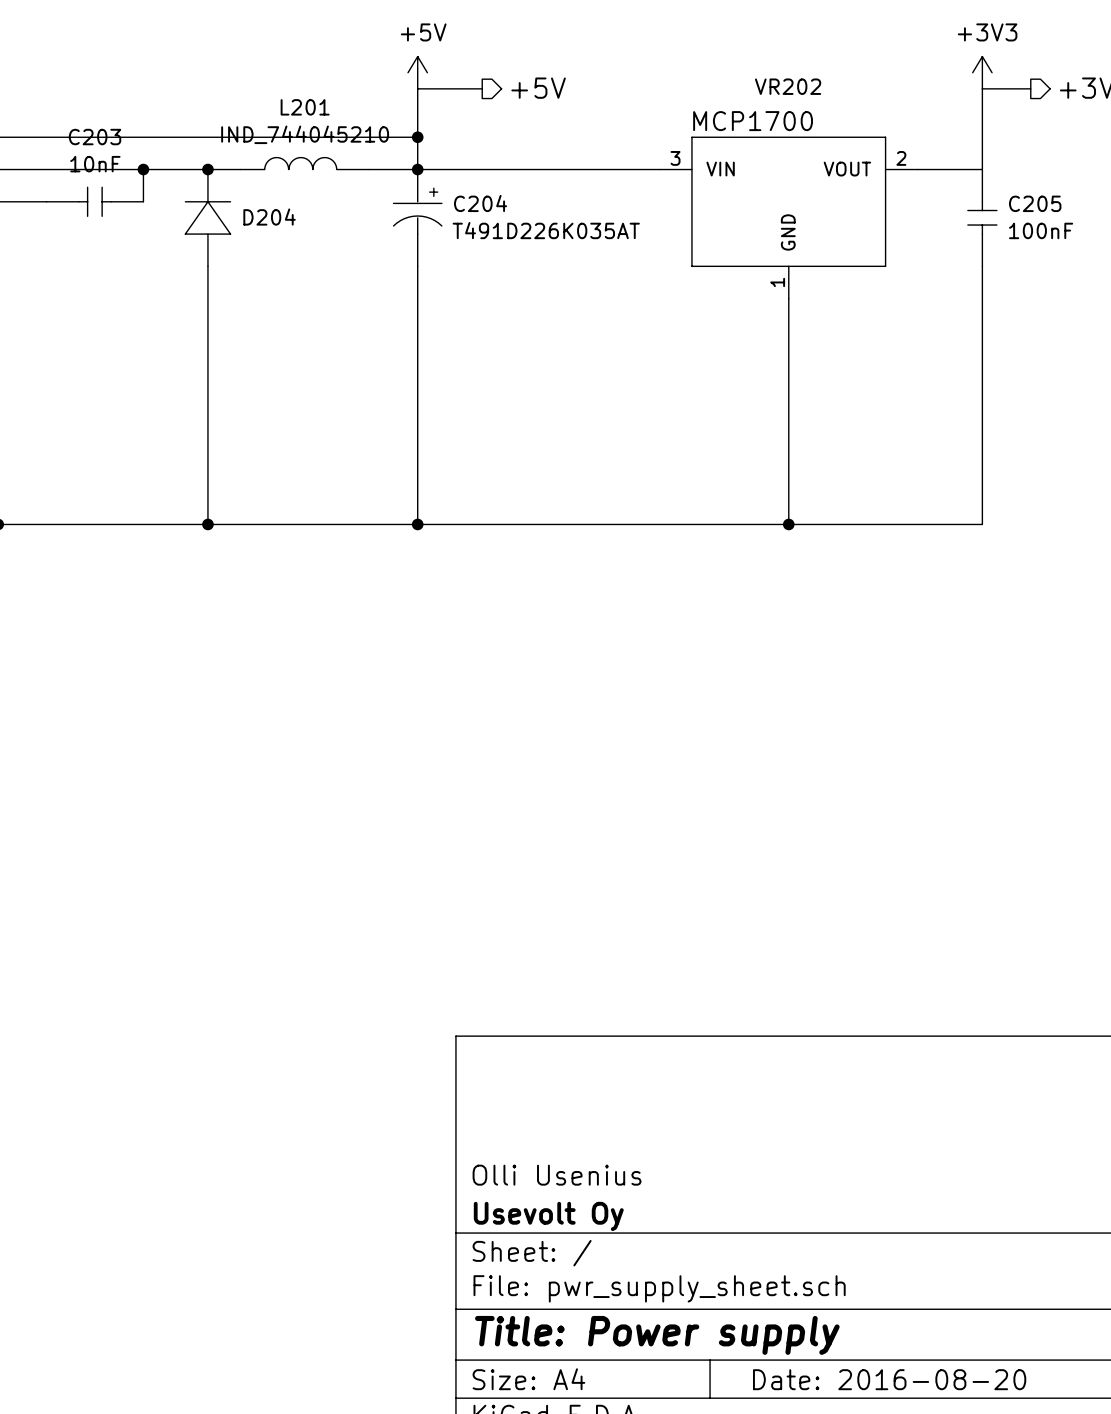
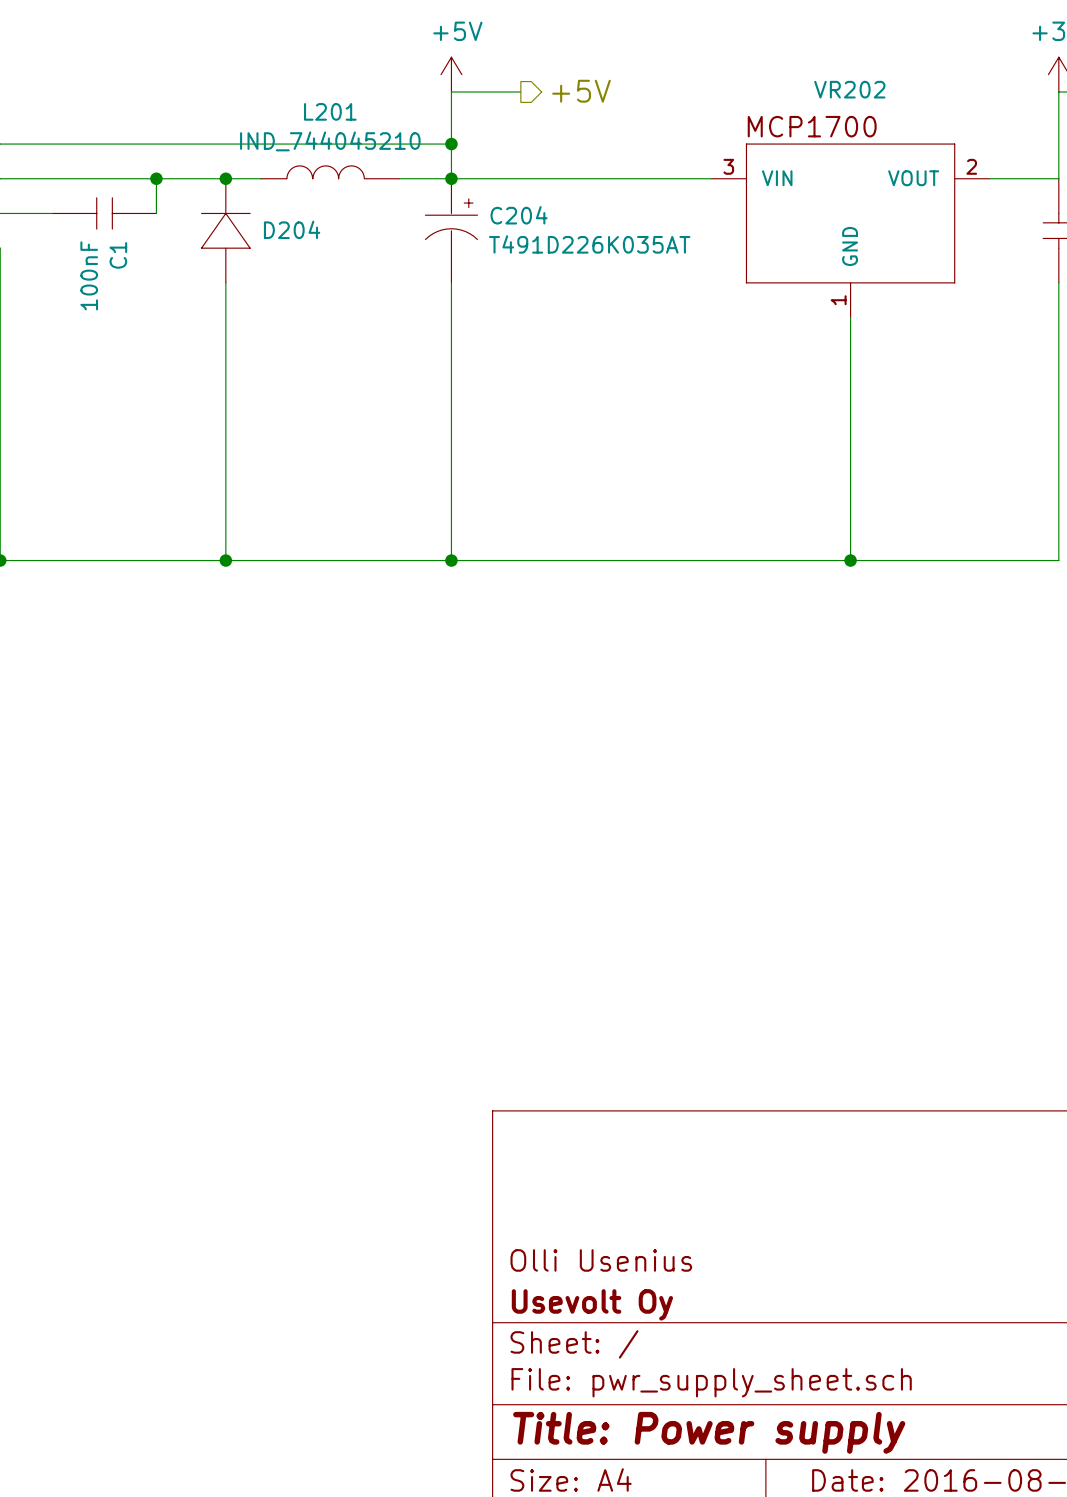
C203 name: C203 (95, 137) -> C1 (118, 255)
C203 value: 10nF (95, 164) -> 100nF (89, 275)

